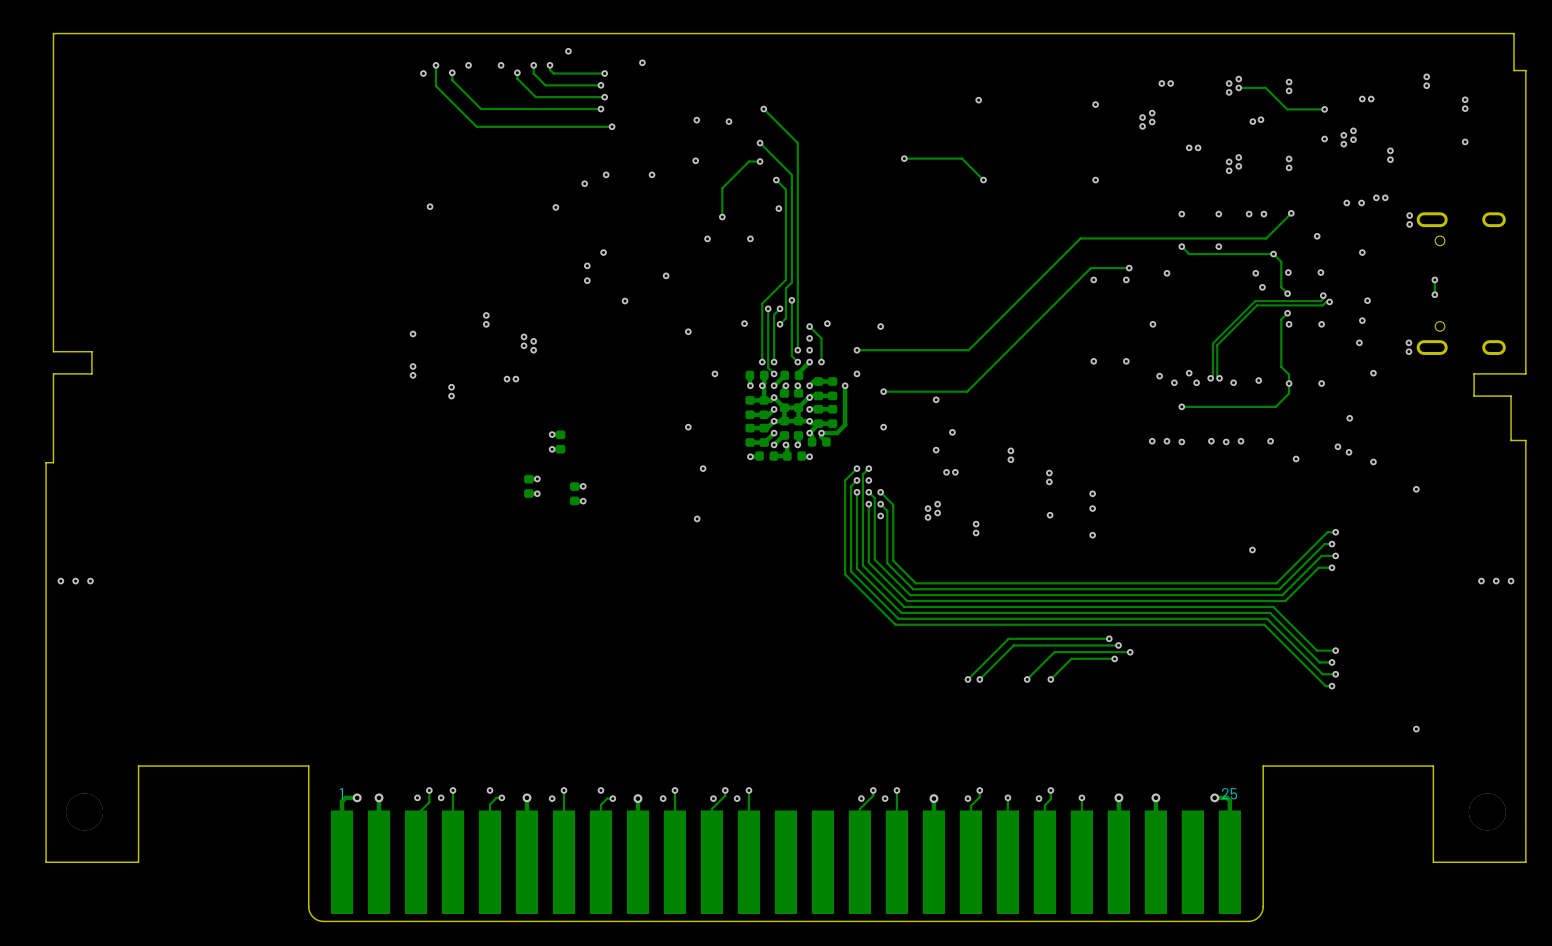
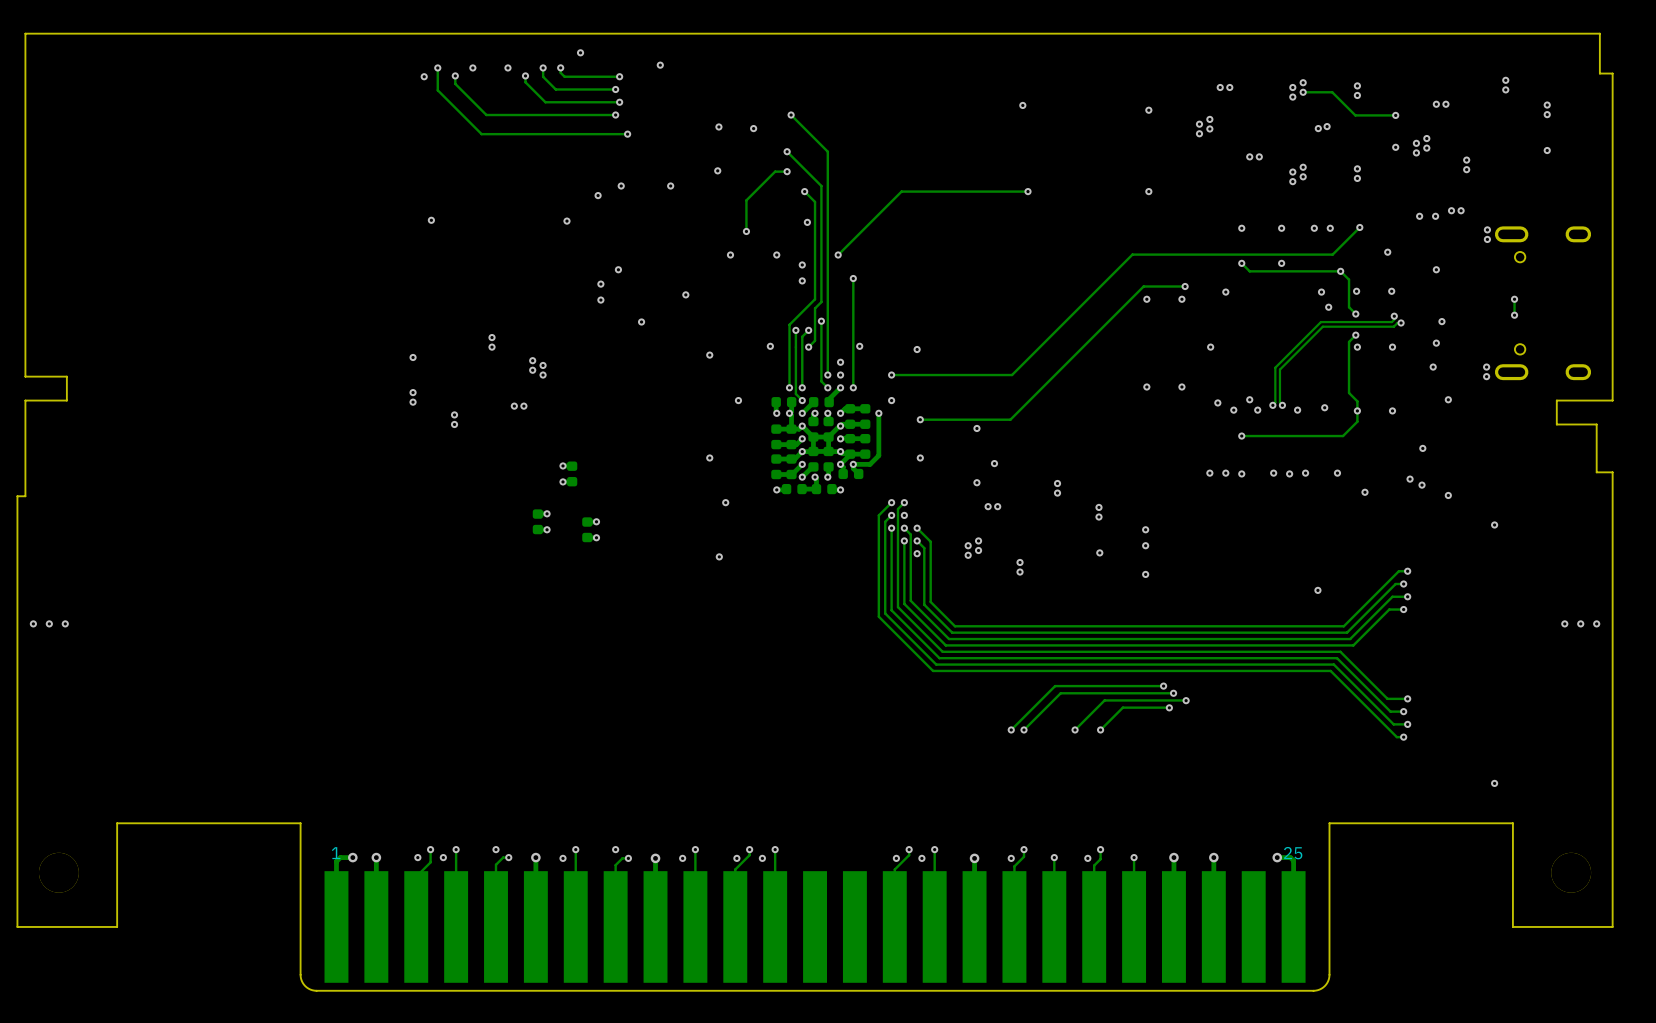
track: (904, 158) (962, 158) (983, 180) -> (838, 255) (901, 191) (1028, 191)
via: (904, 158) -> none
via: none -> (838, 255)
via: none -> (802, 264)
via: none -> (853, 278)
via: none -> (802, 280)
track: (809, 326) (821, 338) -> (853, 278) (853, 362)
via: (809, 326) -> none

